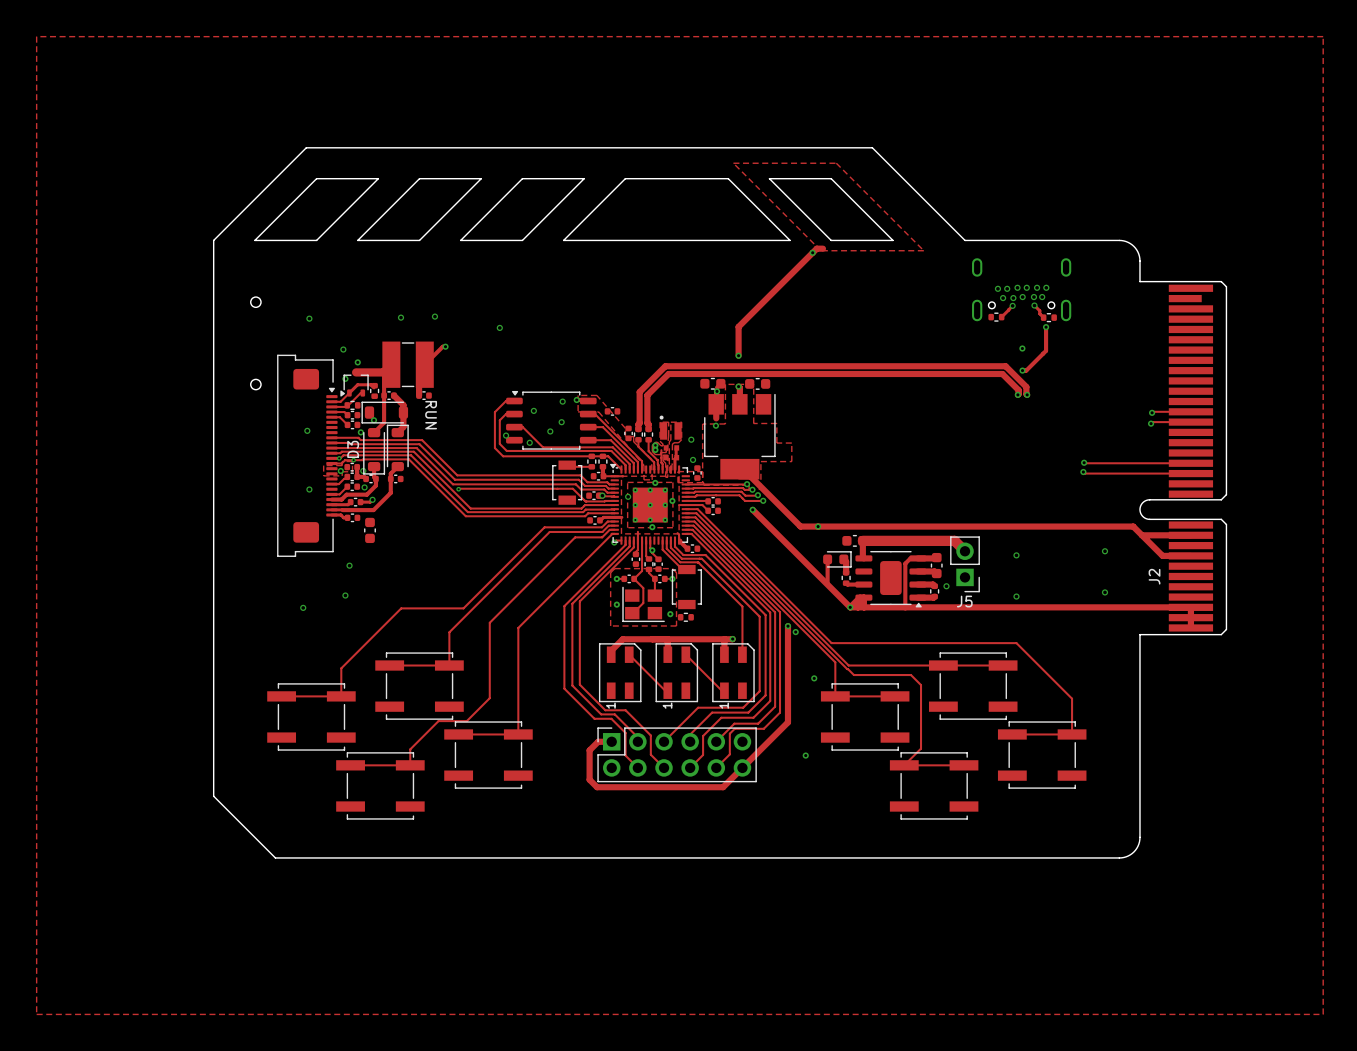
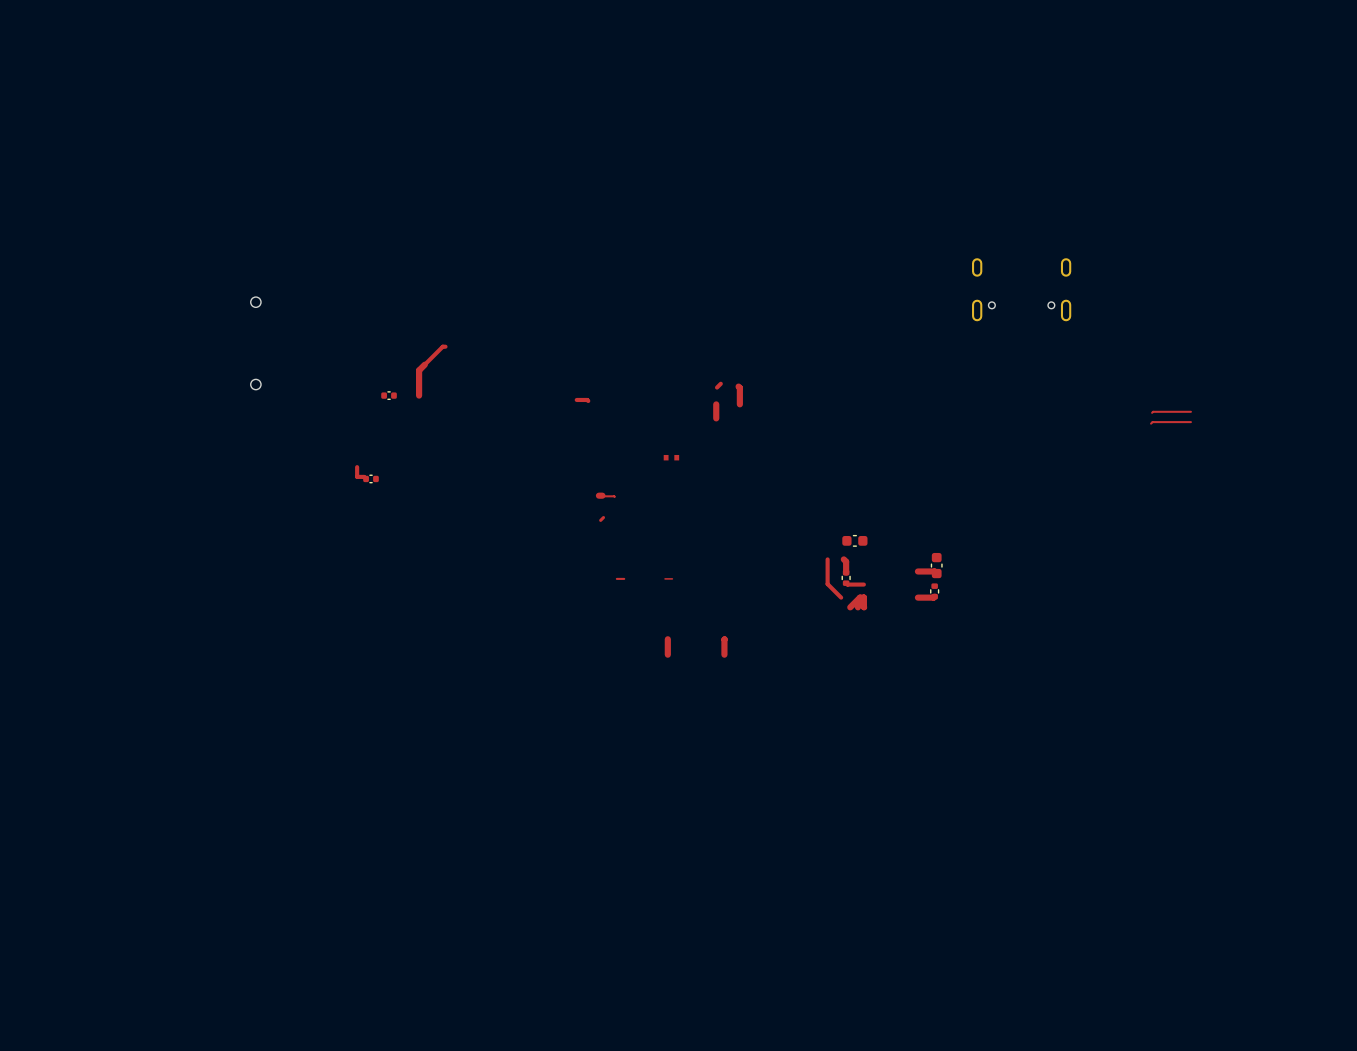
zone outline: (36, 36) (36, 1014) (1323, 1014) (1323, 36) (36, 36) -> none
zone outline: (733, 163) (820, 250) (923, 250) (836, 163) (733, 163) -> none
board edge: (316, 178) (378, 178) (316, 240) (254, 240) (316, 178) -> none
board edge: (419, 178) (481, 178) (419, 240) (357, 240) (419, 178) -> none
board edge: (522, 178) (460, 240) (522, 240) (584, 178) (522, 178) -> none
board edge: (625, 178) (563, 240) (790, 240) (728, 178) (625, 178) -> none
board edge: (769, 178) (831, 178) (892, 240) (831, 240) (769, 178) -> none
track: (822, 248) (816, 248) (738, 326) (738, 355) -> none
via: (812, 252) -> none
board edge: (1139, 281) (1138, 254) (1133, 246) (1123, 240) (965, 240) (872, 147) (306, 147) (213, 240) (213, 796) (275, 857) (1123, 857) (1133, 851) (1139, 839) (1139, 634) -> none
via: (1017, 287) -> none
via: (1026, 287) -> none
via: (1037, 287) -> none
via: (1046, 287) -> none
via: (997, 288) -> none
via: (1007, 288) -> none
via: (1022, 297) -> none
via: (1033, 297) -> none
via: (1042, 297) -> none
via: (1003, 298) -> none
via: (1013, 298) -> none
track: (1012, 305) (1001, 317) -> none
via: (1012, 305) -> none
track: (1034, 305) (1043, 317) -> none
via: (1034, 305) -> none
via: (434, 316) -> none
via: (401, 317) -> none
part: (996, 317) -> none
part: (1048, 317) -> none
via: (309, 318) -> none
via: (499, 327) -> none
track: (1046, 327) (1046, 350) (1026, 370) (1022, 370) -> none
via: (1046, 327) -> none
via: (445, 346) -> none
via: (1022, 348) -> none
via: (343, 349) -> none
via: (738, 355) -> none
via: (357, 362) -> none
track: (391, 364) (383, 372) (356, 372) (384, 372) (384, 422) (374, 432) -> none
part: (408, 364) -> none
via: (1022, 370) -> none
via: (345, 378) -> none
part: (354, 382) -> none
part: (712, 383) -> none
part: (757, 383) -> none
via: (738, 386) -> none
track: (374, 387) (370, 384) (357, 384) (340, 401) (331, 401) -> none
part: (374, 390) -> none
via: (717, 391) -> none
track: (362, 393) (345, 406) (331, 406) -> none
track: (1017, 394) (1018, 390) (1002, 373) (668, 373) (647, 395) (648, 429) -> none
via: (1017, 394) -> none
track: (1027, 394) (1026, 386) (1005, 366) (665, 366) (639, 392) (638, 429) -> none
via: (1027, 394) -> none
track: (393, 395) (403, 405) (403, 426) (397, 432) -> none
part: (424, 395) -> none
zone outline: (578, 395) (578, 411) (598, 411) (643, 465) (643, 479) (652, 479) (651, 459) (633, 441) (633, 436) (625, 436) (625, 428) (596, 395) (578, 395) -> none
via: (576, 399) -> none
track: (507, 401) (514, 401) (506, 401) (494, 412) (494, 448) (503, 456) (608, 456) (621, 469) -> none
via: (562, 401) -> none
part: (352, 405) -> none
via: (533, 410) -> none
part: (612, 411) -> none
track: (331, 412) (344, 412) (347, 415) -> none
part: (384, 412) -> none
via: (1152, 412) -> none
track: (506, 414) (514, 414) (506, 414) (499, 420) (499, 443) (506, 450) (611, 450) (625, 465) (625, 469) -> none
track: (588, 414) (594, 414) (642, 461) (642, 469) -> none
part: (352, 415) -> none
text: RUN (431, 415) -> none
track: (331, 417) (339, 417) (347, 424) -> none
via: (373, 420) -> none
part: (551, 420) -> none
via: (561, 422) -> none
zone outline: (660, 422) (668, 422) (667, 450) (666, 452) (660, 452) (660, 454) (655, 454) (652, 451) (652, 445) (657, 442) (663, 445) (660, 441) (660, 422) -> none
zone outline: (670, 422) (669, 441) (669, 472) (671, 472) (672, 444) (681, 439) (681, 422) (670, 422) -> none
via: (1151, 423) -> none
part: (352, 424) -> none
via: (715, 425) -> none
track: (514, 427) (522, 427) (542, 447) (612, 447) (629, 464) (629, 469) -> none
track: (588, 427) (602, 427) (637, 462) (637, 469) -> none
part: (670, 427) -> none
via: (307, 430) -> none
via: (550, 431) -> none
via: (360, 432) -> none
part: (628, 433) -> none
part: (638, 434) -> none
part: (648, 434) -> none
via: (506, 435) -> none
part: (739, 436) -> none
track: (331, 437) (358, 437) (360, 440) (422, 440) (457, 475) (580, 475) (587, 482) (607, 482) (614, 484) -> none
track: (638, 439) (638, 446) (654, 462) (654, 469) -> none
track: (648, 439) (648, 451) (657, 460) -> none
via: (691, 439) -> none
track: (588, 440) (610, 440) (633, 463) (633, 469) -> none
track: (331, 442) (419, 444) (455, 479) (578, 479) (584, 485) (605, 485) (608, 488) (614, 488) -> none
via: (529, 442) -> none
via: (655, 445) -> none
part: (397, 447) -> none
part: (671, 447) -> none
track: (676, 447) (674, 469) -> none
track: (331, 448) (416, 448) (452, 484) (575, 484) (581, 489) (604, 489) (607, 492) (614, 492) -> none
via: (655, 449) -> none
track: (661, 450) (662, 469) -> none
D3: (374, 451) -> none
track: (331, 453) (413, 451) (470, 508) (581, 508) (585, 505) (614, 505) -> none
part: (307, 455) -> none
zone outline: (663, 455) (663, 460) (665, 463) (665, 477) (667, 477) (667, 455) (663, 455) -> none
track: (331, 458) (340, 458) (343, 455) (411, 455) (467, 512) (583, 512) (585, 509) (614, 509) -> none
via: (339, 458) -> none
J2: (1183, 458) -> none
via: (693, 459) -> none
via: (353, 460) -> none
track: (657, 460) (658, 469) -> none
zone outline: (342, 461) (352, 461) (352, 471) (342, 471) (342, 475) (323, 475) (323, 465) (342, 465) (342, 461) -> none
part: (591, 461) -> none
part: (602, 461) -> none
track: (1084, 462) (1190, 463) -> none
via: (1084, 462) -> none
track: (331, 463) (341, 463) (345, 460) (408, 459) (465, 516) (585, 516) (588, 513) (614, 513) -> none
track: (374, 466) (375, 485) (366, 494) (346, 494) (341, 499) (331, 499) -> none
track: (397, 466) (390, 473) (390, 492) (373, 510) (331, 509) -> none
track: (570, 466) (591, 466) -> none
track: (602, 466) (603, 476) (623, 476) -> none
part: (352, 467) -> none
via: (340, 470) -> none
via: (363, 470) -> none
zone outline: (702, 471) (677, 471) (677, 482) (703, 482) (703, 485) (749, 485) (749, 489) (760, 489) (760, 461) (791, 461) (791, 443) (776, 443) (776, 423) (753, 423) (753, 384) (725, 384) (725, 424) (702, 424) (702, 482) -> none
track: (1083, 472) (1084, 473) (1190, 473) -> none
via: (1083, 472) -> none
part: (697, 473) -> none
part: (352, 476) -> none
part: (598, 476) -> none
zone outline: (621, 476) (621, 533) (679, 533) (679, 476) (621, 476) -> none
track: (739, 476) (750, 476) (800, 526) (1133, 526) (1162, 555) (1190, 555) -> none
track: (347, 478) (344, 478) (338, 484) (331, 484) -> none
part: (395, 478) -> none
part: (567, 482) -> none
zone outline: (627, 482) (627, 527) (672, 527) (672, 482) (627, 482) -> none
via: (655, 482) -> none
track: (747, 484) (685, 484) -> none
via: (747, 484) -> none
track: (347, 486) (339, 494) (331, 494) -> none
part: (352, 486) -> none
via: (364, 487) -> none
track: (685, 488) (742, 488) (752, 489) -> none
via: (309, 489) -> none
track: (458, 489) (572, 488) (585, 501) (614, 500) -> none
via: (458, 489) -> none
via: (752, 489) -> none
track: (685, 492) (741, 491) (745, 495) (757, 495) -> none
part: (593, 495) -> none
via: (602, 495) -> none
via: (757, 495) -> none
via: (628, 496) -> none
track: (685, 496) (739, 495) (745, 500) (763, 500) -> none
track: (372, 499) (370, 502) (360, 502) -> none
via: (372, 499) -> none
via: (672, 500) -> none
track: (685, 500) (708, 501) -> none
via: (763, 500) -> none
part: (713, 501) -> none
track: (350, 502) (348, 504) (331, 504) -> none
part: (355, 502) -> none
part: (649, 504) -> none
track: (678, 505) (702, 505) (708, 510) -> none
track: (685, 509) (697, 509) (831, 643) (1016, 643) (1072, 698) (1072, 734) (1012, 734) -> none
track: (752, 509) (850, 607) (1190, 607) (1190, 627) -> none
via: (752, 509) -> none
part: (713, 510) -> none
track: (685, 513) (696, 513) (848, 665) (1003, 665) -> none
track: (331, 514) (340, 514) (347, 517) -> none
part: (352, 517) -> none
track: (603, 517) (621, 517) -> none
track: (685, 517) (695, 517) (853, 675) (910, 675) (921, 685) (921, 748) (904, 765) (963, 765) -> none
part: (595, 520) -> none
track: (614, 521) (607, 521) (602, 527) (544, 527) (463, 608) (401, 608) (341, 668) (341, 696) (281, 696) -> none
track: (685, 521) (694, 521) (835, 662) (835, 696) (895, 696) -> none
track: (614, 525) (608, 525) (602, 531) (549, 531) (449, 632) (449, 665) (389, 665) -> none
track: (685, 525) (693, 525) (780, 612) (780, 712) (763, 728) (734, 728) (729, 733) (729, 754) (716, 767) -> none
via: (818, 526) -> none
via: (652, 527) -> none
track: (614, 529) (609, 529) (602, 537) (575, 537) (489, 622) (489, 698) (466, 721) (438, 721) (410, 749) (410, 765) (350, 765) -> none
track: (685, 529) (692, 529) (775, 612) (775, 706) (758, 723) (734, 723) (716, 741) -> none
part: (369, 530) -> none
track: (637, 531) (637, 540) -> none
track: (614, 533) (612, 533) (518, 627) (518, 734) (458, 734) -> none
track: (677, 533) (679, 540) -> none
track: (685, 533) (691, 533) (770, 612) (770, 701) (753, 717) (721, 717) (703, 736) (703, 755) (690, 767) -> none
track: (1142, 535) (1190, 535) -> none
track: (621, 540) (614, 542) -> none
track: (625, 540) (625, 544) (564, 606) (564, 688) (594, 718) (611, 718) (625, 733) (625, 755) (637, 767) -> none
track: (629, 540) (629, 546) (572, 603) (572, 685) (601, 714) (614, 714) (637, 737) (637, 741) -> none
track: (633, 540) (633, 547) (579, 601) (579, 684) (605, 710) (625, 710) (650, 735) (650, 754) (664, 767) -> none
track: (637, 540) (637, 549) (635, 552) -> none
track: (642, 540) (642, 570) (634, 578) (643, 588) (643, 603) (632, 613) -> none
track: (646, 540) (646, 556) (648, 558) -> none
track: (650, 540) (652, 553) (658, 559) -> none
track: (662, 540) (662, 549) (682, 569) -> none
track: (666, 540) (666, 548) (680, 562) (698, 562) (742, 606) (742, 654) -> none
track: (670, 540) (670, 547) (681, 558) (701, 558) (759, 616) (759, 691) (743, 707) (698, 707) (664, 741) -> none
track: (674, 540) (674, 546) (683, 555) (705, 555) (765, 615) (765, 695) (748, 712) (712, 712) (690, 734) (690, 741) -> none
track: (680, 540) (687, 548) -> none
via: (614, 542) -> none
part: (692, 548) -> none
via: (652, 550) -> none
track: (965, 551) (954, 540) (862, 540) (863, 558) -> none
via: (1104, 551) -> none
via: (1016, 555) -> none
track: (936, 557) (910, 558) (905, 563) (905, 607) -> none
part: (635, 559) -> none
part: (837, 559) -> none
part: (648, 564) -> none
part: (658, 564) -> none
J5: (965, 564) -> none
via: (349, 565) -> none
zone outline: (614, 568) (672, 568) (676, 572) (676, 625) (610, 625) (610, 572) (614, 568) -> none
track: (648, 569) (648, 572) (654, 578) (654, 595) -> none
via: (616, 578) -> none
part: (629, 578) -> none
part: (659, 578) -> none
via: (672, 578) -> none
part: (890, 579) -> none
track: (917, 584) (934, 586) -> none
via: (946, 586) -> none
part: (686, 587) -> none
via: (1104, 592) -> none
via: (345, 595) -> none
via: (1016, 596) -> none
via: (616, 604) -> none
part: (643, 604) -> none
via: (303, 607) -> none
via: (850, 607) -> none
via: (670, 614) -> none
part: (685, 617) -> none
track: (787, 626) (787, 722) (723, 787) (597, 787) (589, 779) (589, 750) (598, 741) (611, 741) -> none
via: (787, 626) -> none
via: (795, 632) -> none
track: (732, 639) (622, 639) (611, 650) (611, 654) -> none
via: (732, 639) -> none
track: (629, 654) (665, 690) (667, 690) -> none
track: (685, 654) (721, 690) (724, 690) -> none
part: (620, 672) -> none
part: (676, 672) -> none
part: (733, 672) -> none
via: (814, 678) -> none
part: (419, 686) -> none
part: (973, 686) -> none
part: (311, 716) -> none
part: (865, 716) -> none
part: (677, 754) -> none
part: (488, 755) -> none
via: (805, 755) -> none
part: (1042, 755) -> none
part: (380, 785) -> none
part: (934, 785) -> none

